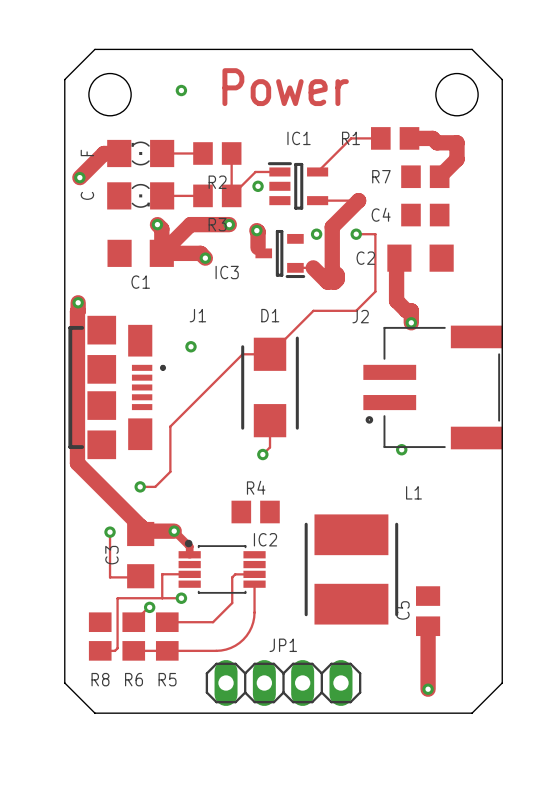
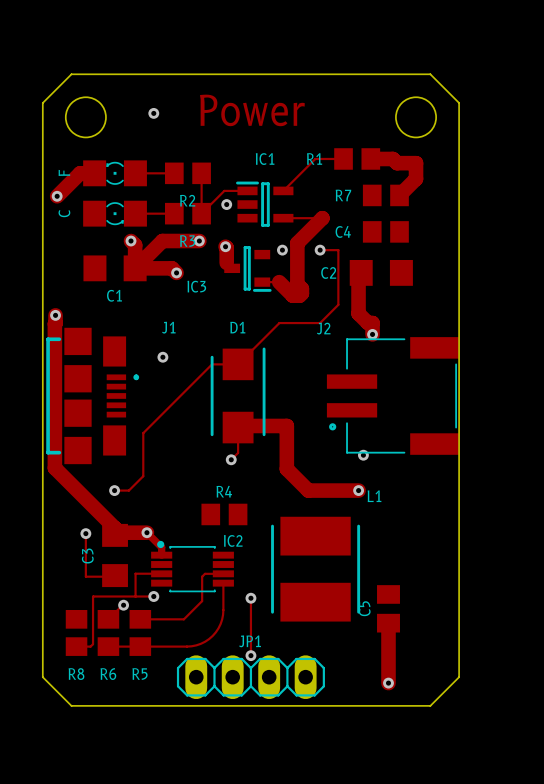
track: none -> (240, 429) (243, 425) (286, 425) (286, 469) (308, 490) (358, 490)
via: none -> (358, 490)
track: none -> (250, 598) (250, 655)
via: none -> (250, 598)
via: none -> (250, 655)

